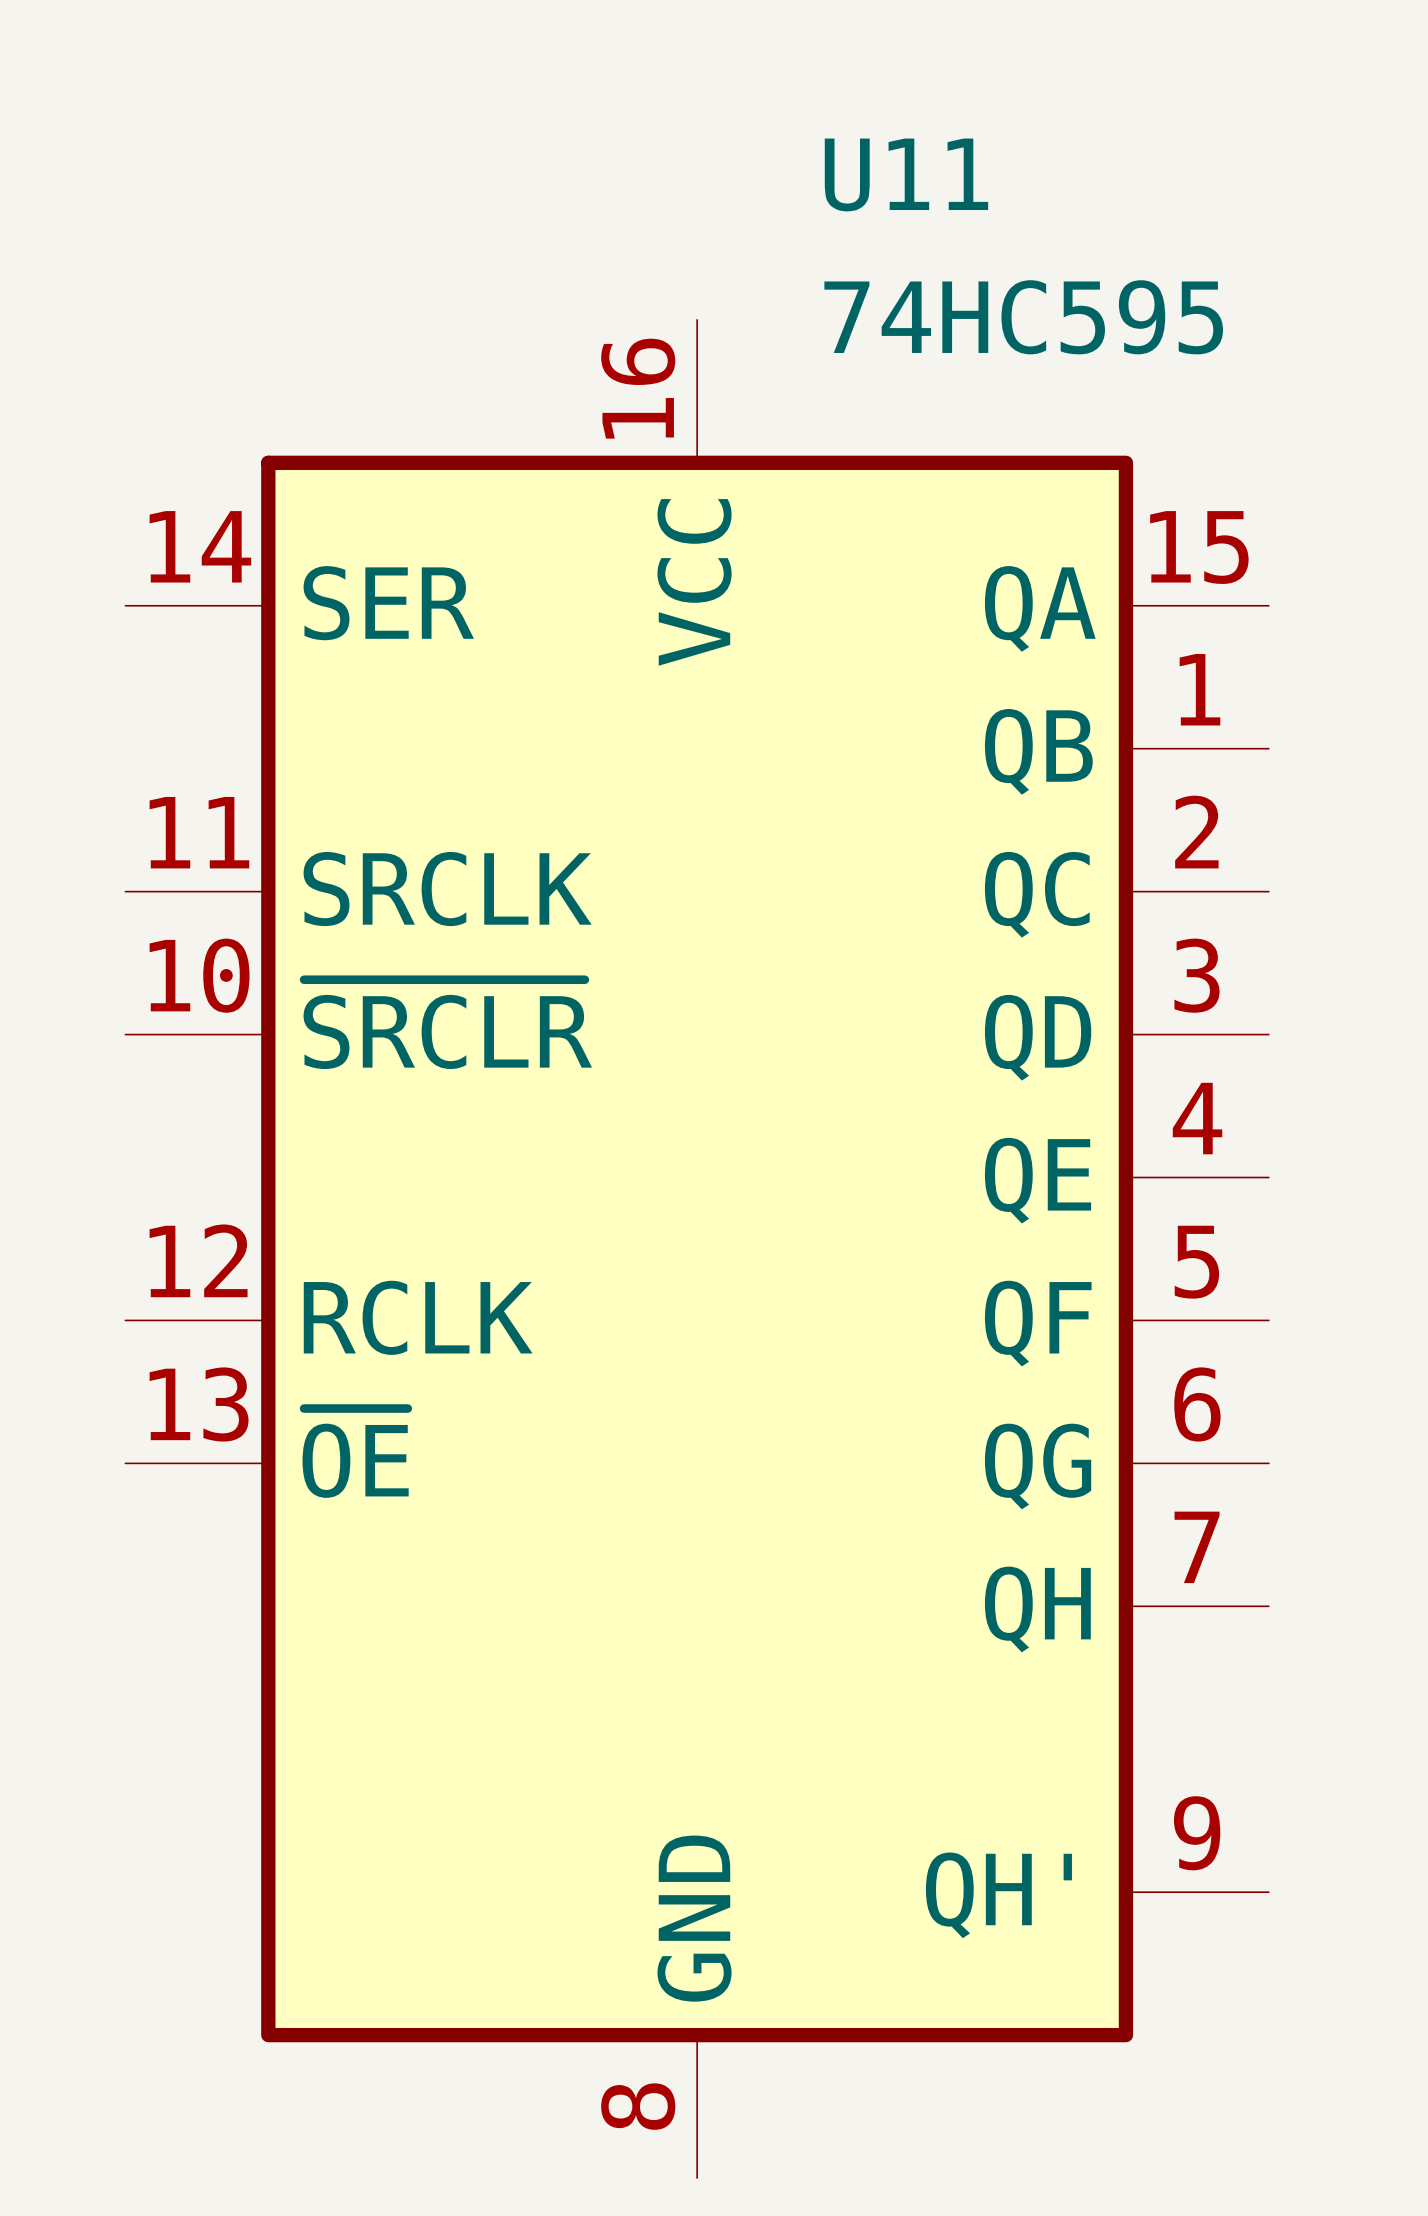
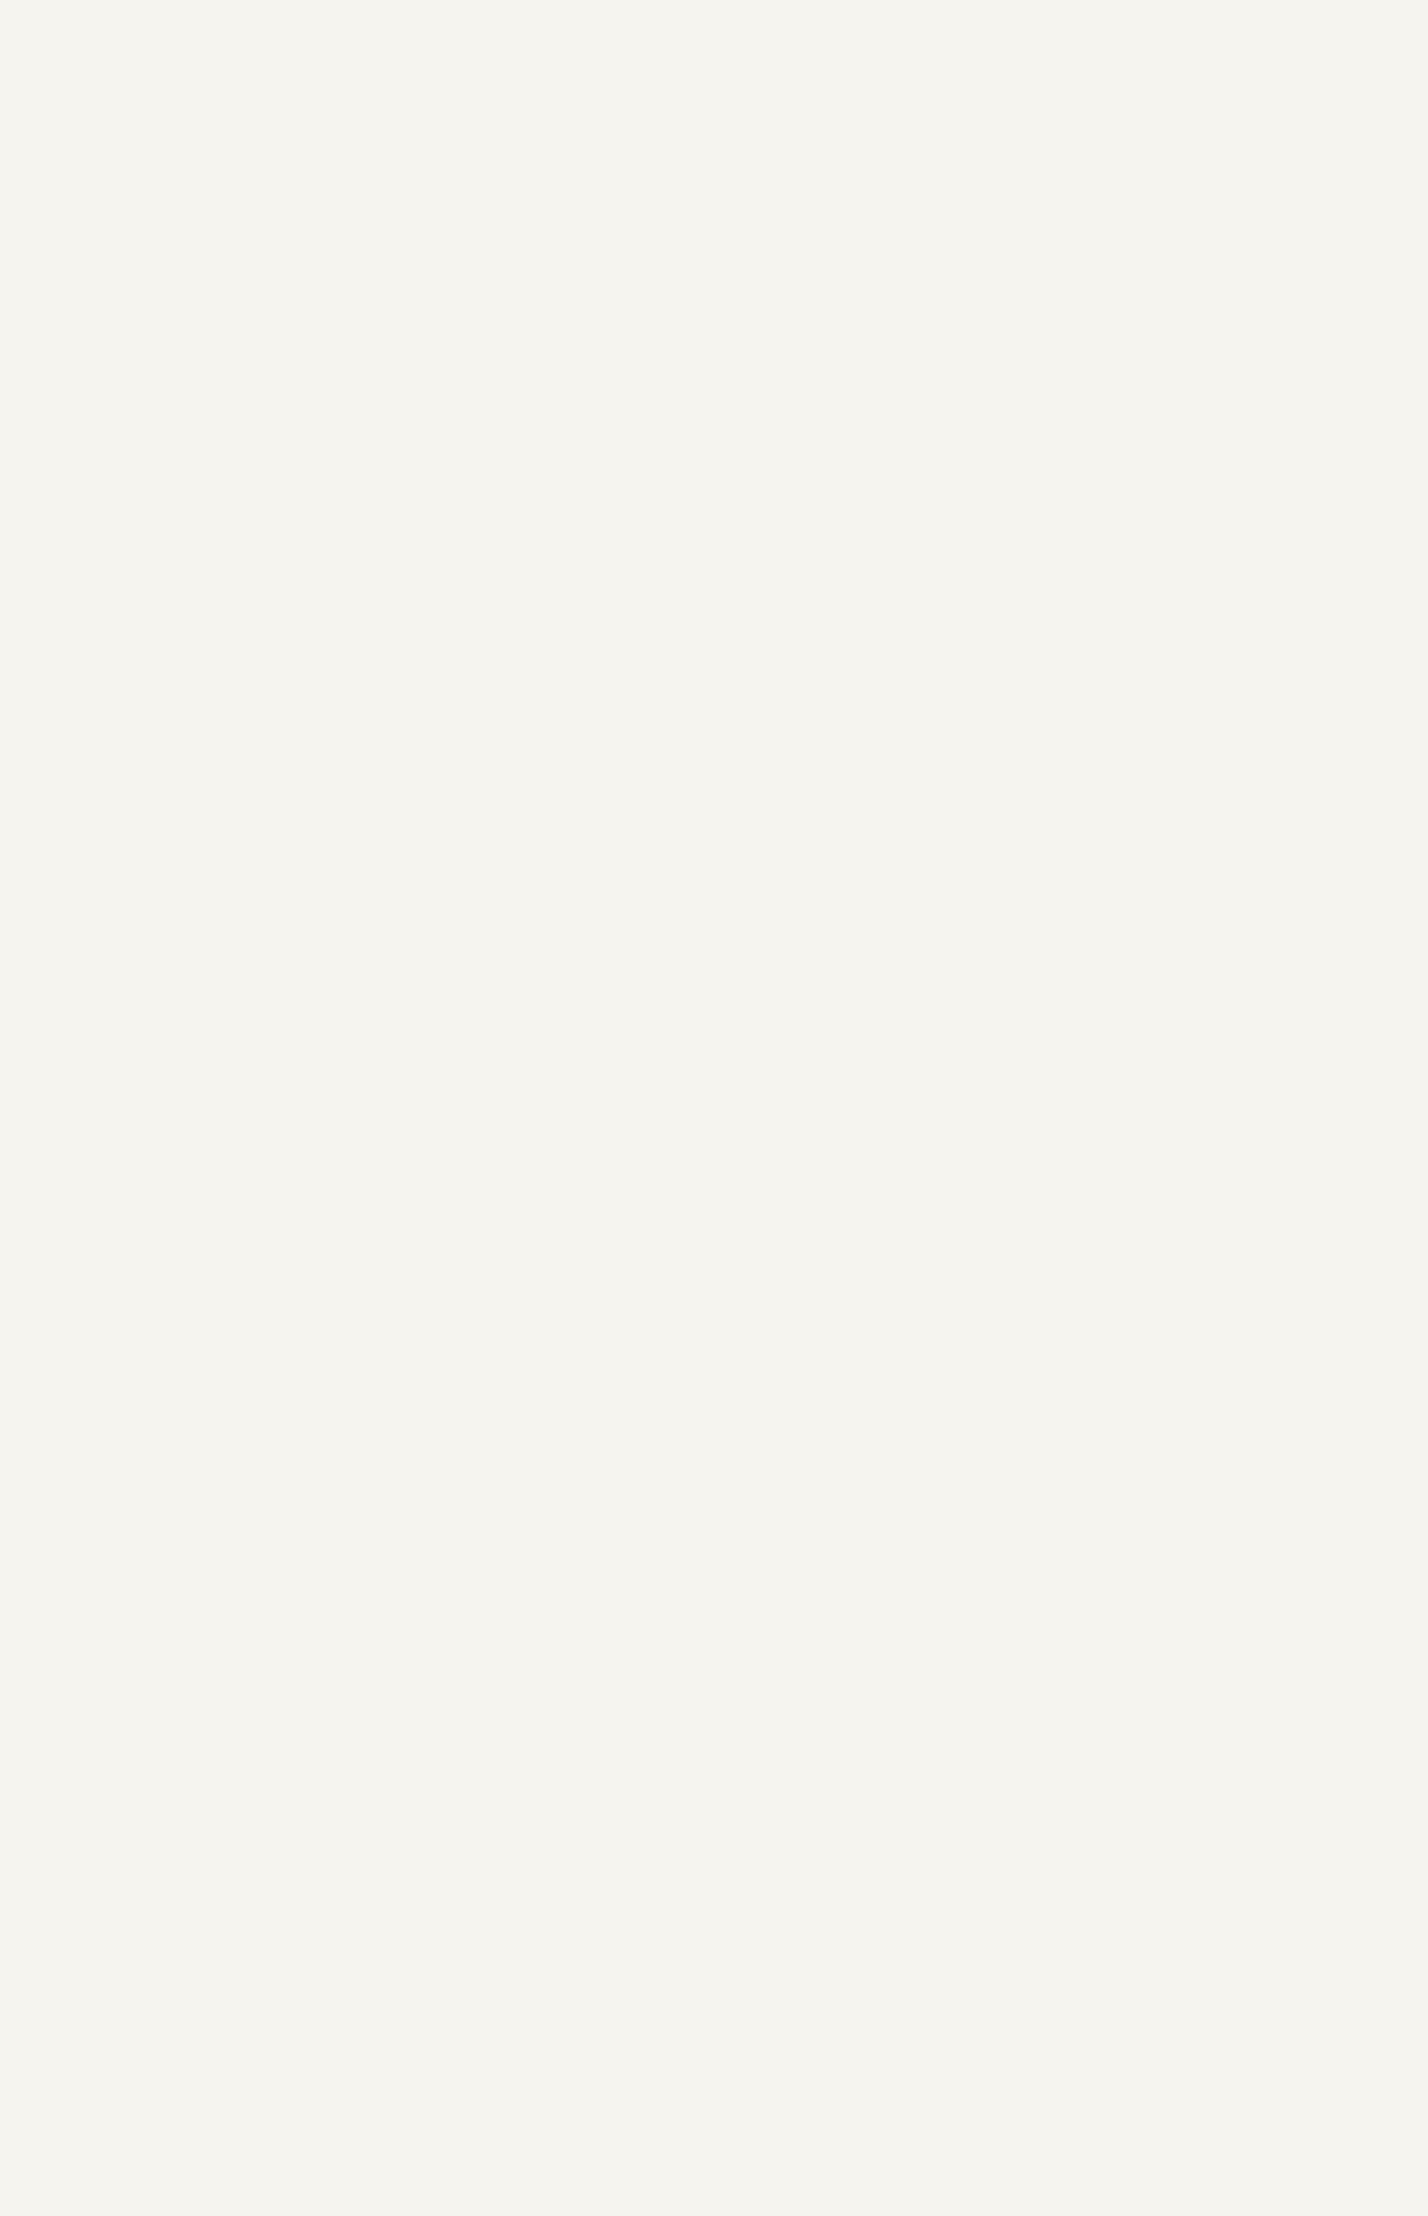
U11: 74HC595 (697, 1248) -> none

